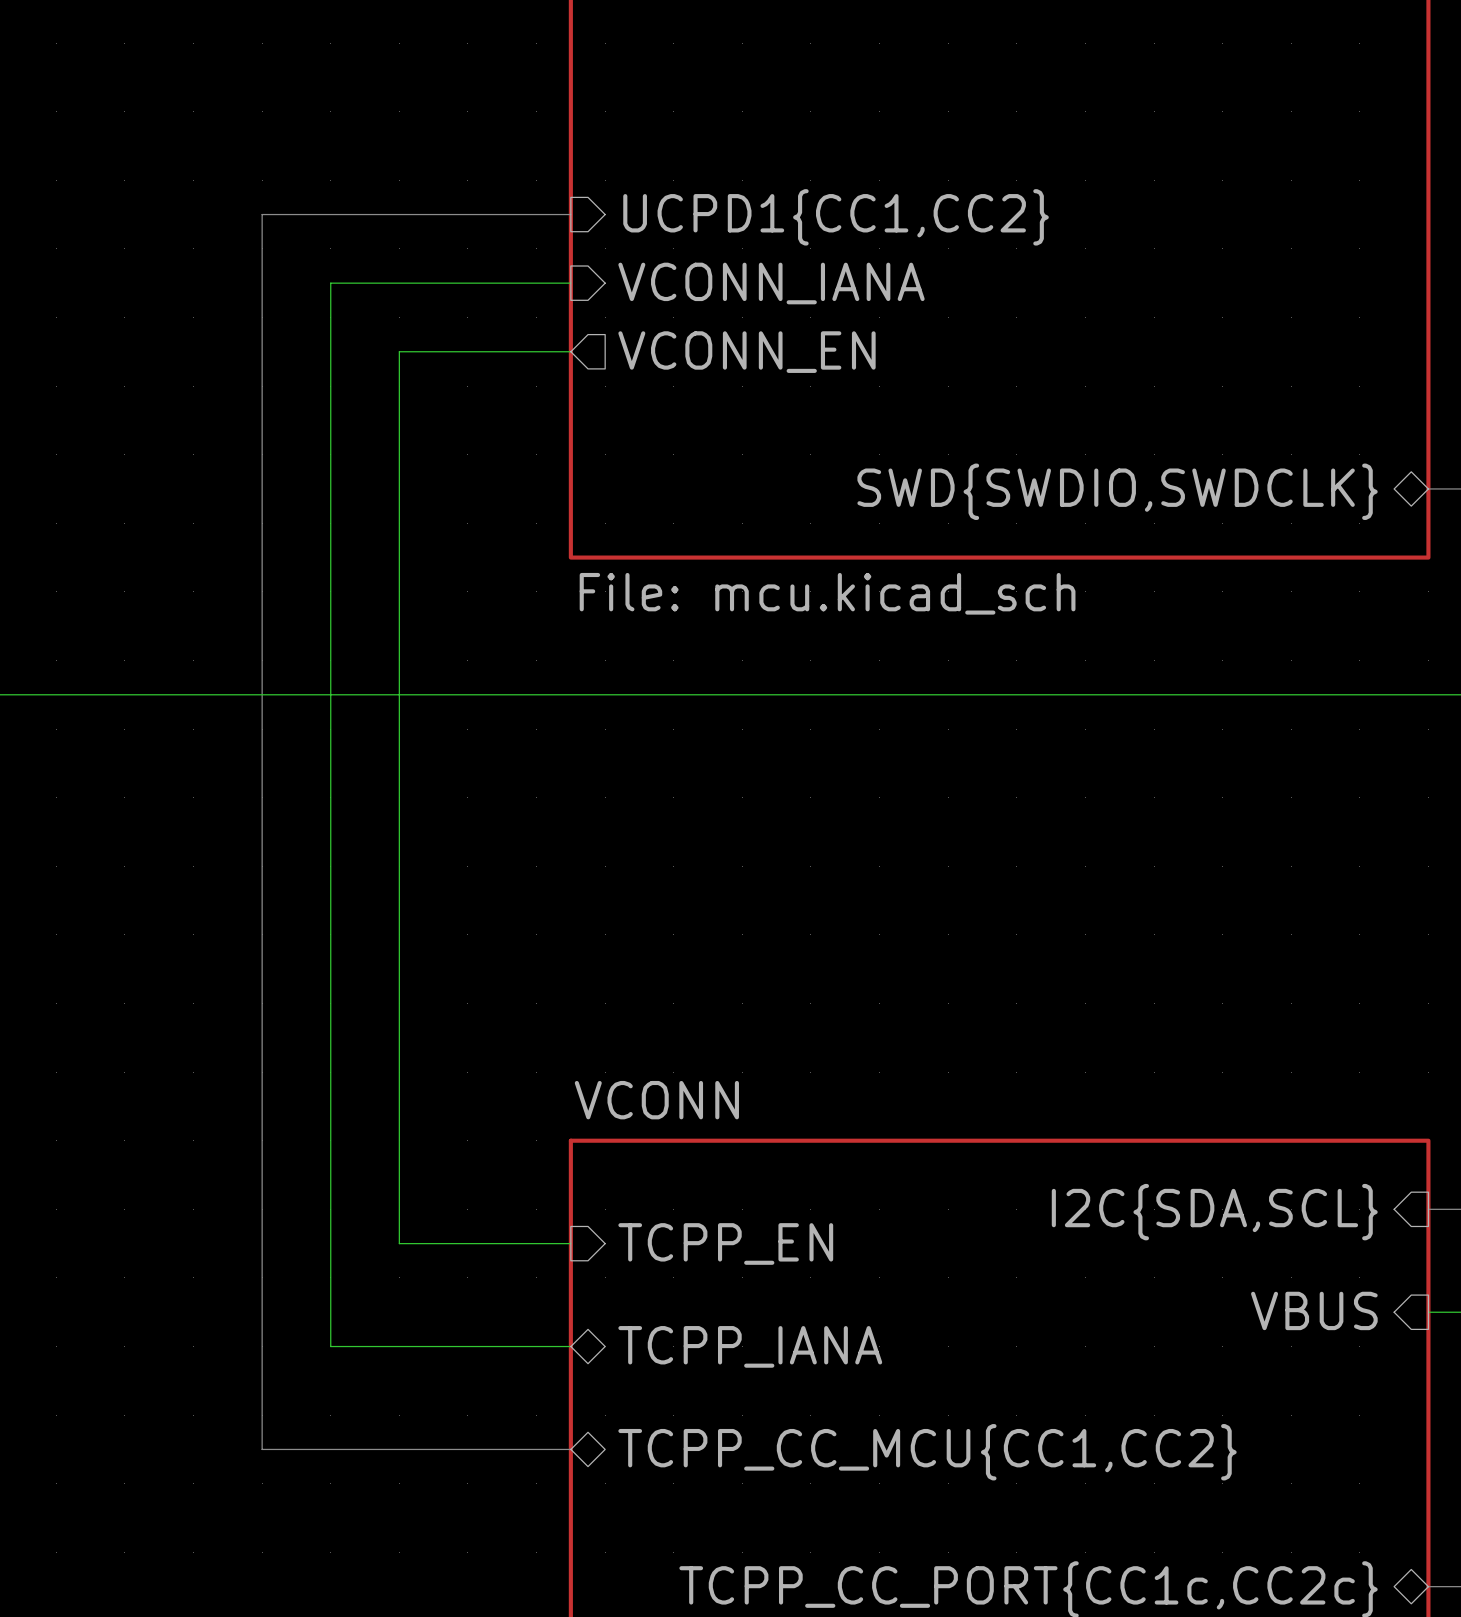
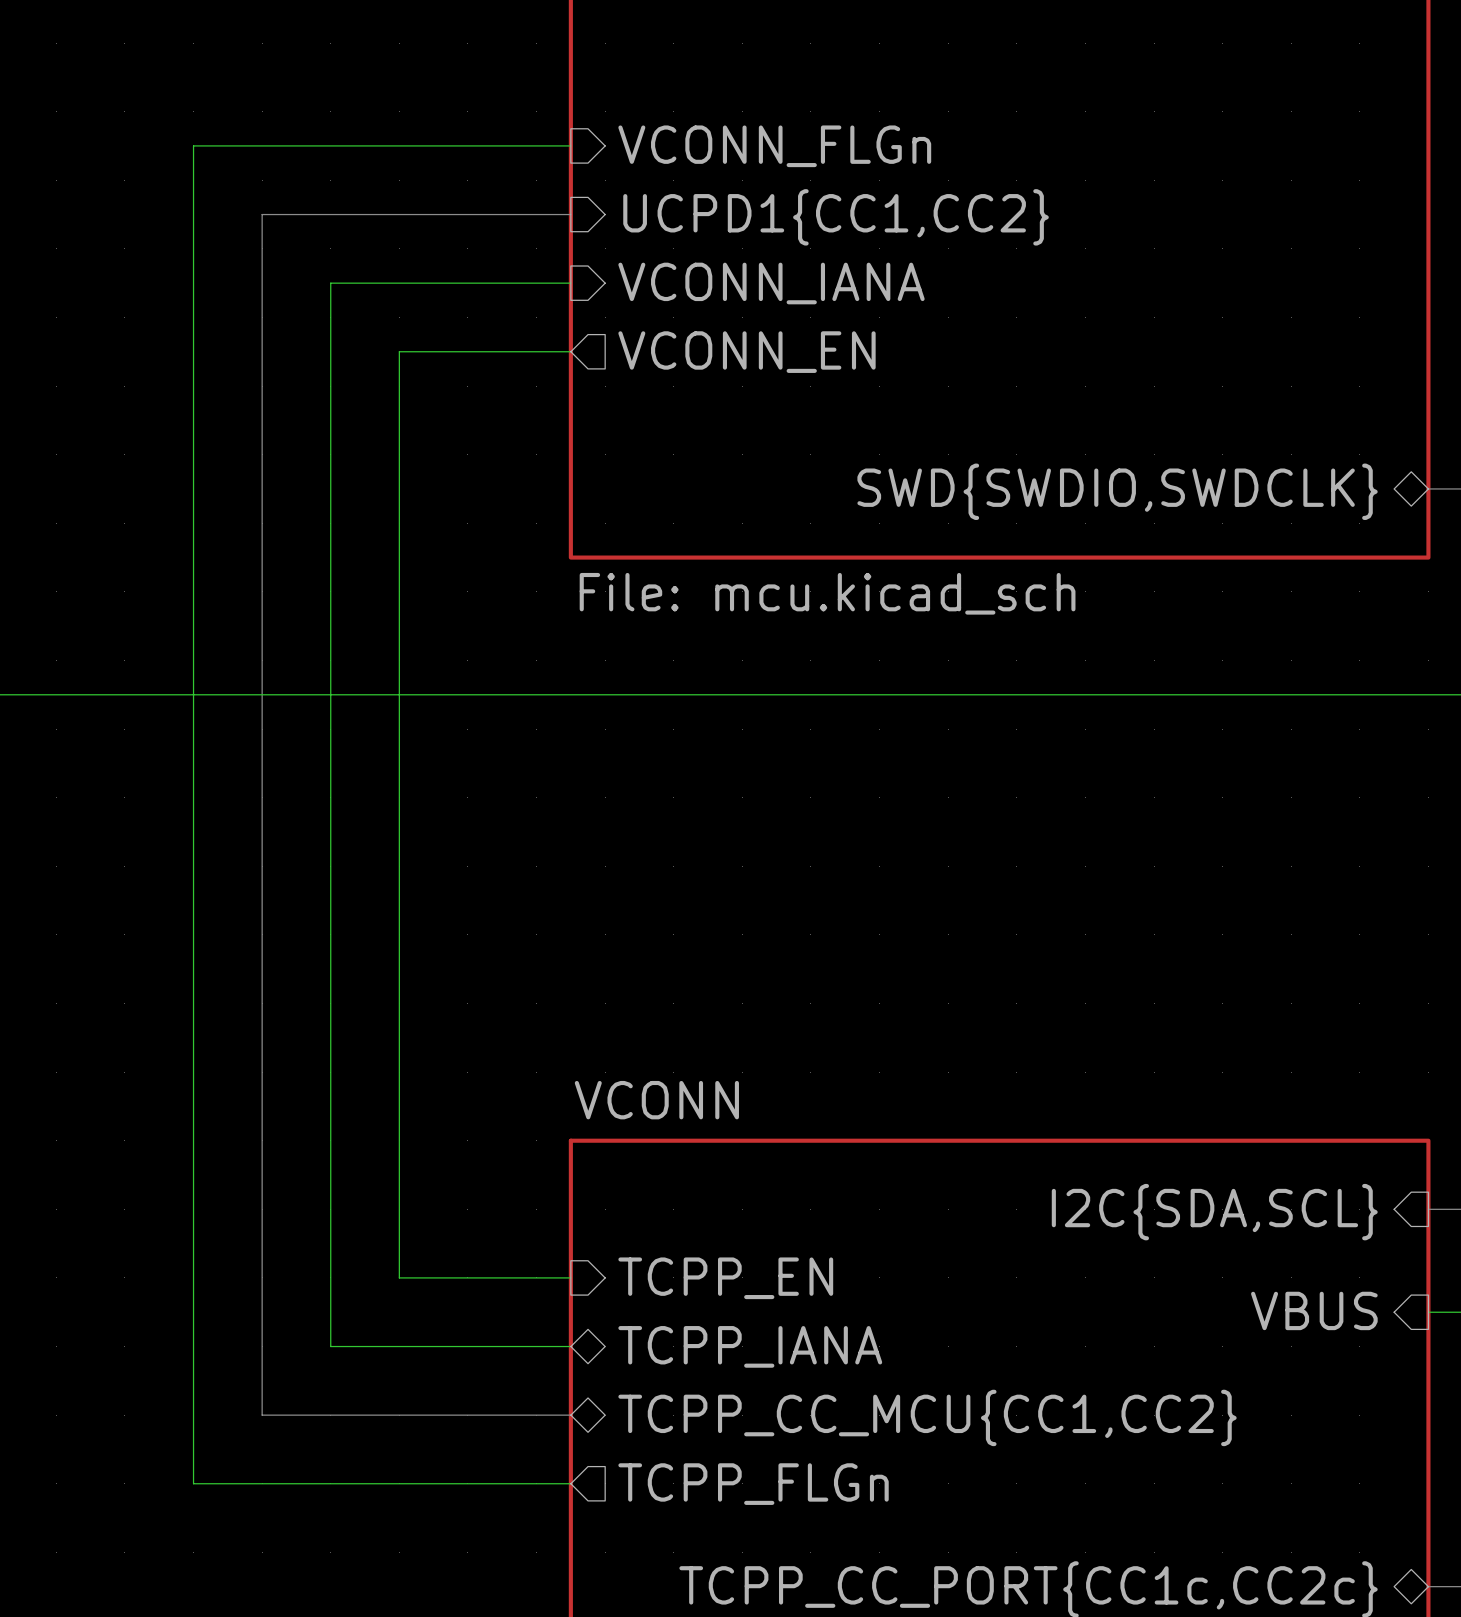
wire: none -> (570, 145) (193, 145) (193, 1483) (570, 1483)
sheet pin: none -> VCONN_FLGn (774, 146)
wire: (399, 1243) (570, 1243) -> (399, 1243) (399, 1277) (570, 1277)
sheet pin position: TCPP_EN (725, 1243) -> TCPP_EN (725, 1278)
bus: (262, 1415) (262, 1449) (570, 1449) -> (262, 1415) (570, 1415)
sheet pin position: TCPP_CC_MCU{CC1,CC2} (927, 1452) -> TCPP_CC_MCU{CC1,CC2} (927, 1417)
sheet pin: none -> TCPP_FLGn (753, 1484)

